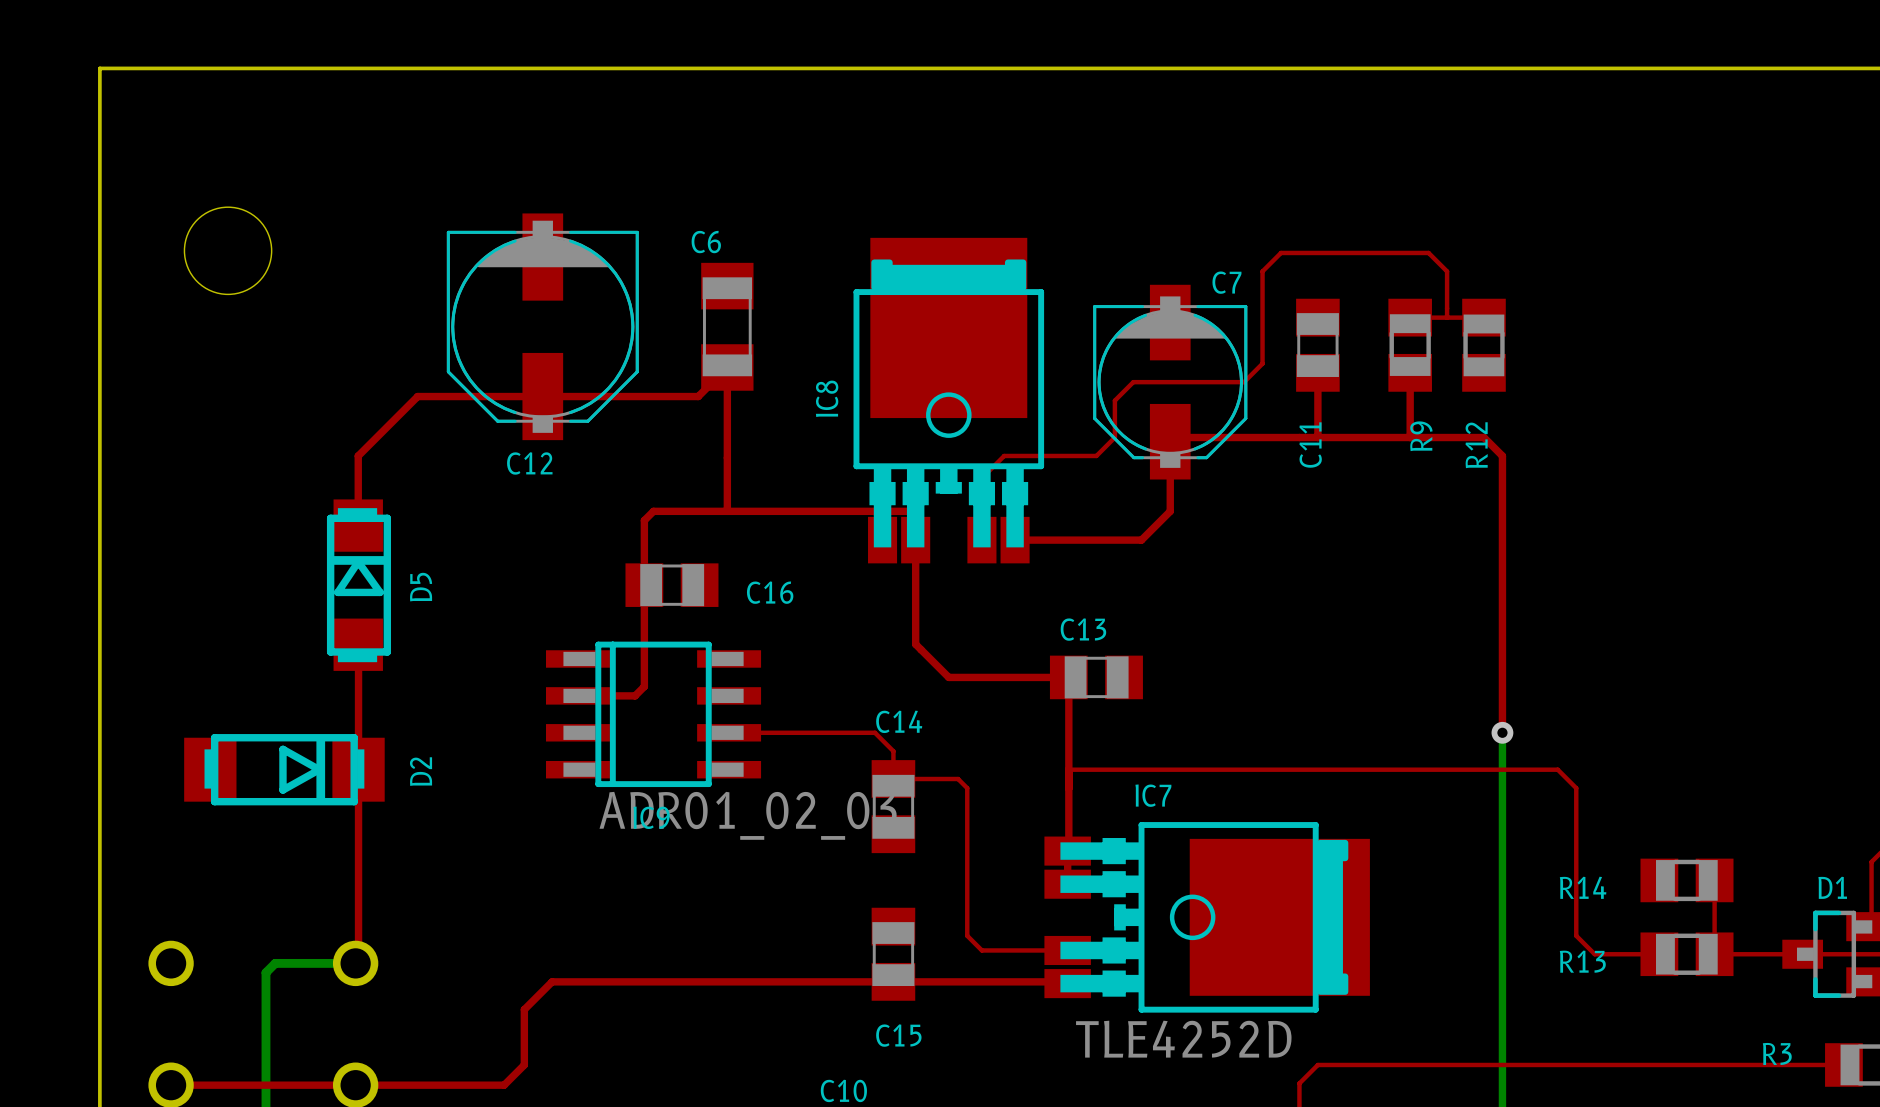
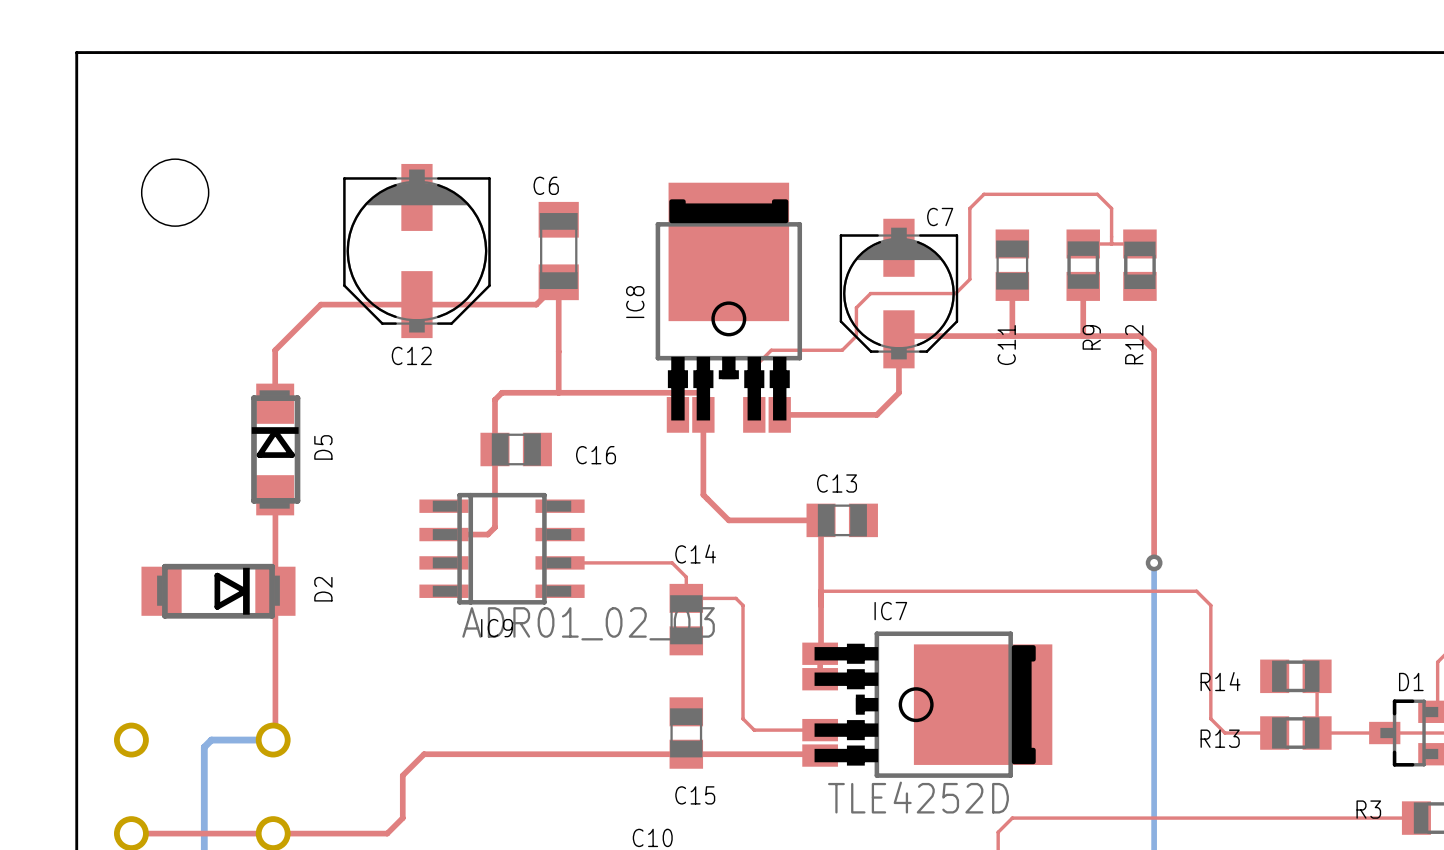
IC8 footprint: [853, 237, 1045, 564] -> [655, 182, 803, 433]
D5 footprint: [326, 499, 392, 671] -> [251, 383, 301, 516]
IC9 footprint: [545, 641, 762, 788] -> [419, 492, 585, 605]
D2 footprint: [184, 734, 385, 806] -> [141, 563, 296, 619]
IC7 footprint: [1044, 822, 1370, 1013] -> [802, 631, 1053, 778]

